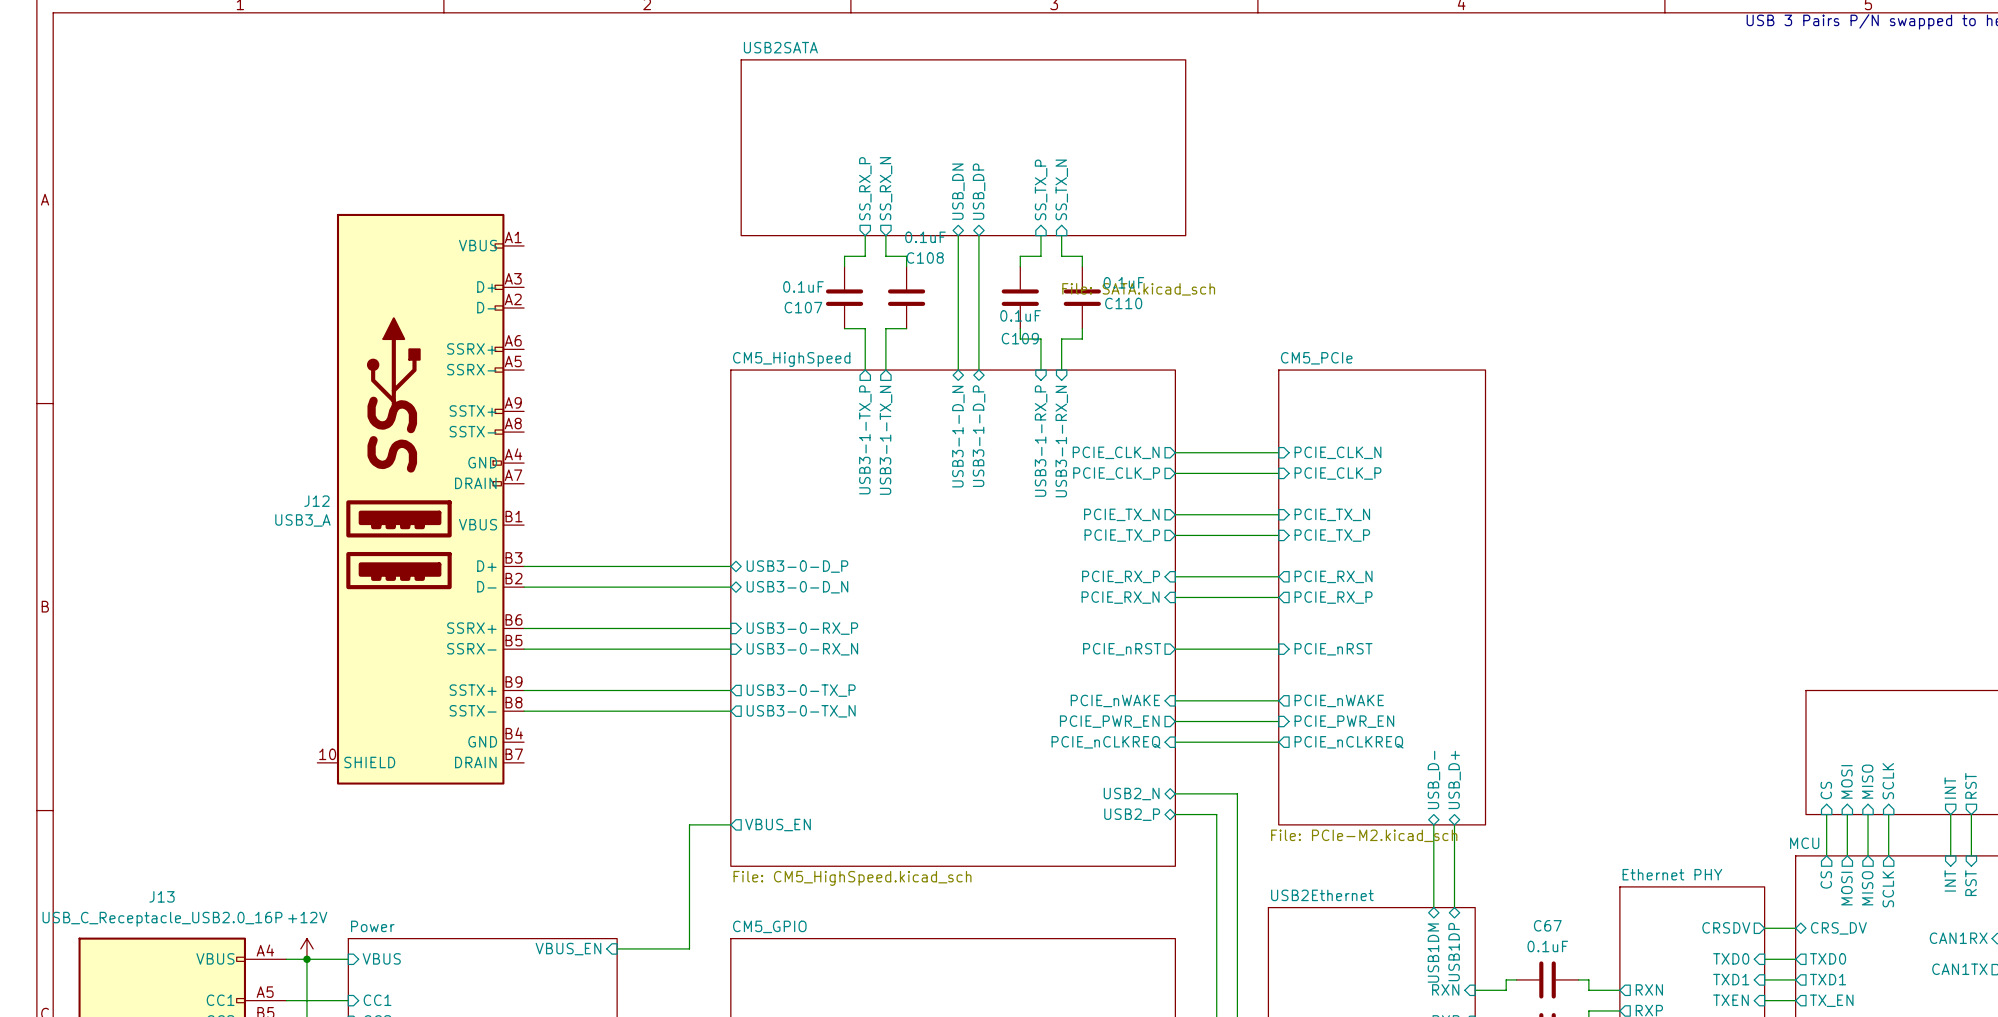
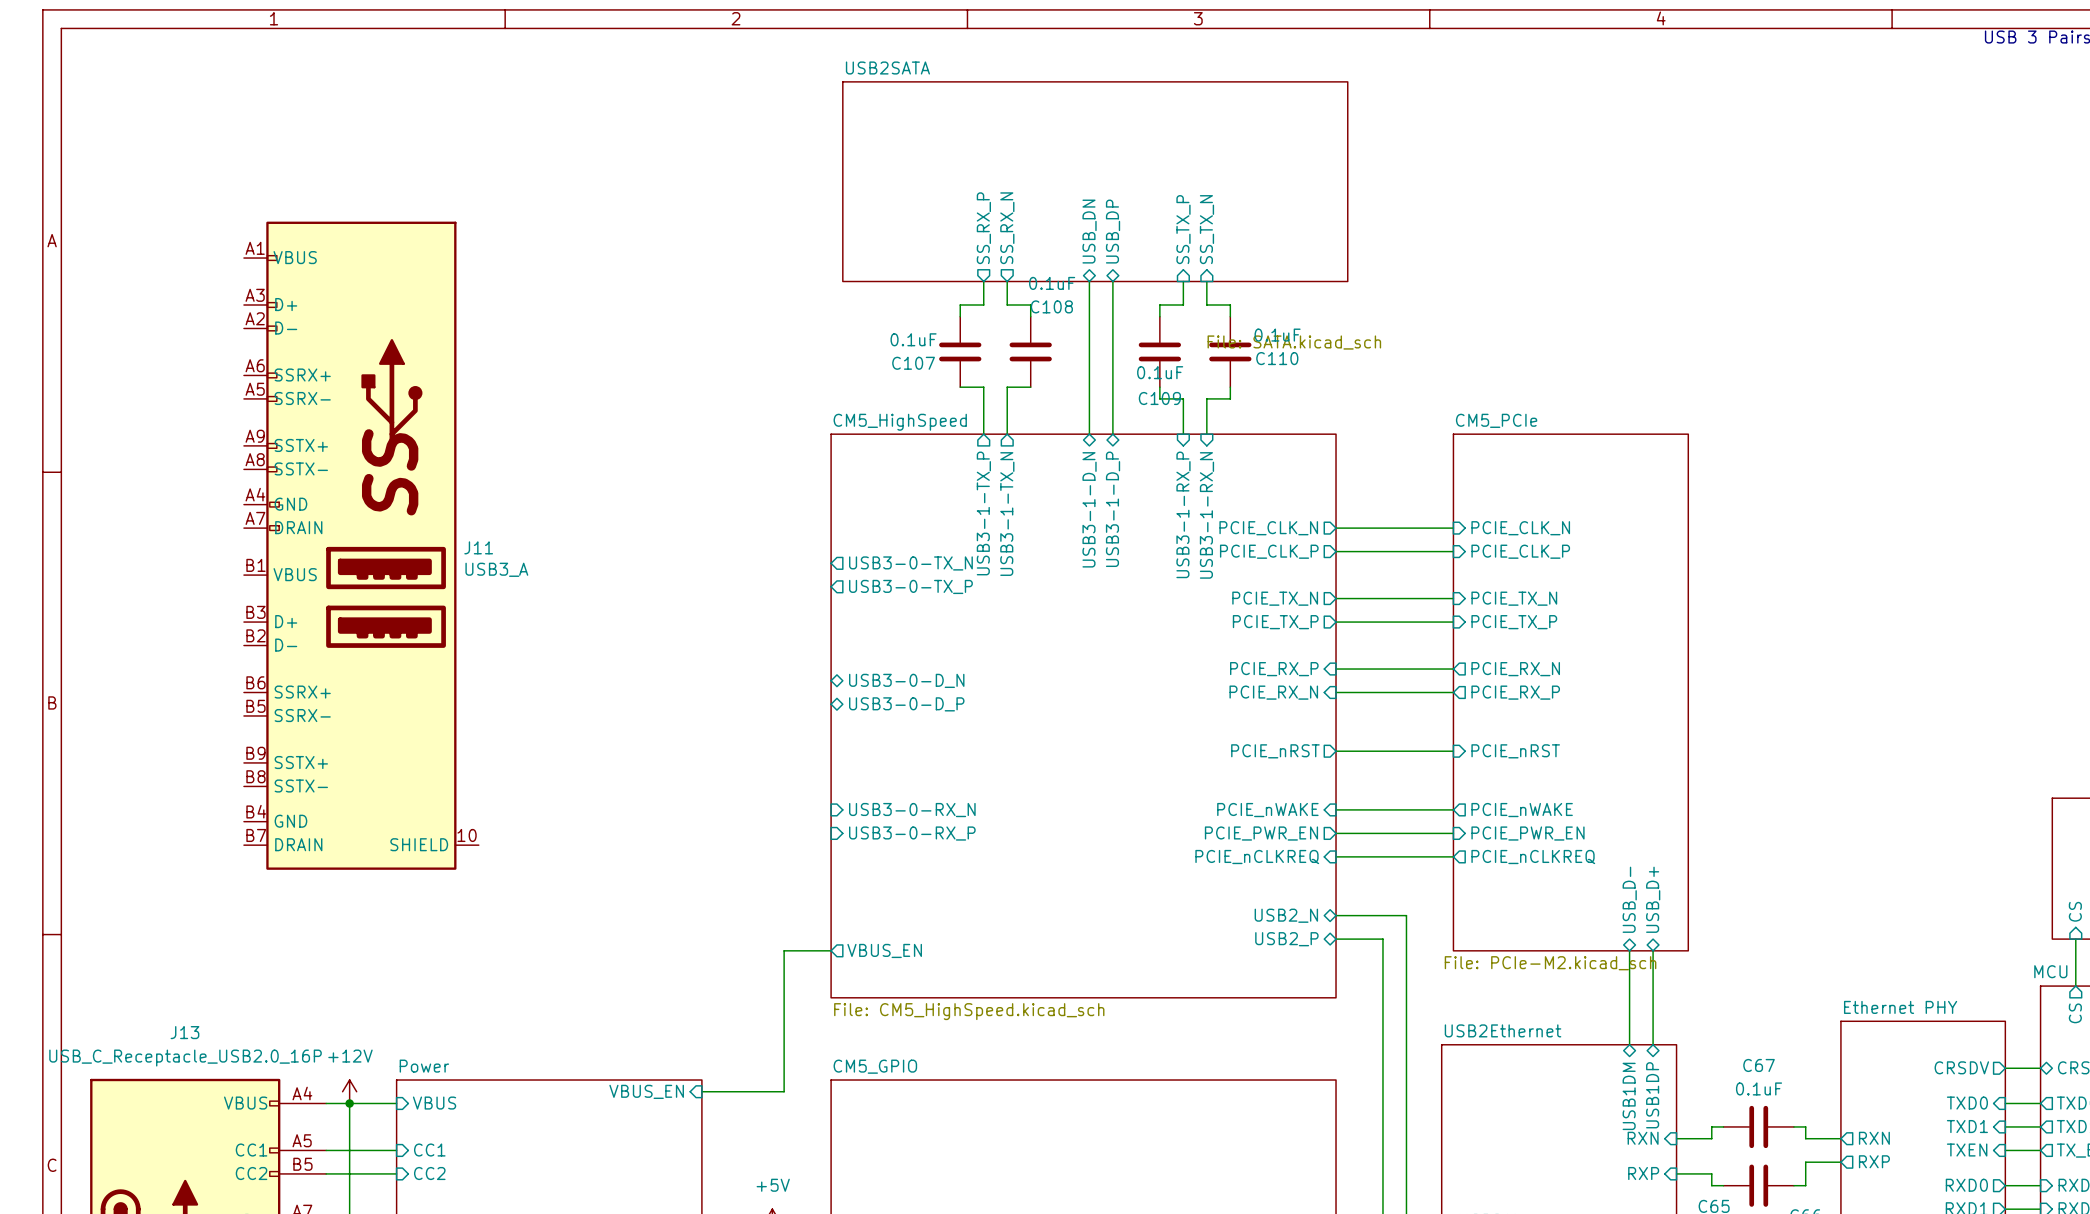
J11: none -> USB3_A (361, 545)
sheet pin: none -> USB3-0-TX_N (910, 563)
J12: USB3_A (420, 499) -> none
wire: (524, 566) (730, 566) -> none
sheet pin position: USB3-0-D_P (797, 566) -> USB3-0-D_P (906, 704)
wire: (524, 587) (730, 587) -> none
wire: (524, 628) (730, 628) -> none
sheet pin position: USB3-0-RX_P (802, 628) -> USB3-0-RX_P (912, 833)
wire: (524, 649) (730, 649) -> none
sheet pin position: USB3-0-RX_N (802, 649) -> USB3-0-RX_N (912, 810)
wire: (524, 690) (730, 690) -> none
sheet pin position: USB3-0-TX_P (801, 690) -> USB3-0-TX_P (910, 586)
wire: (524, 711) (730, 711) -> none
sheet pin: USB3-0-TX_N (801, 711) -> none

